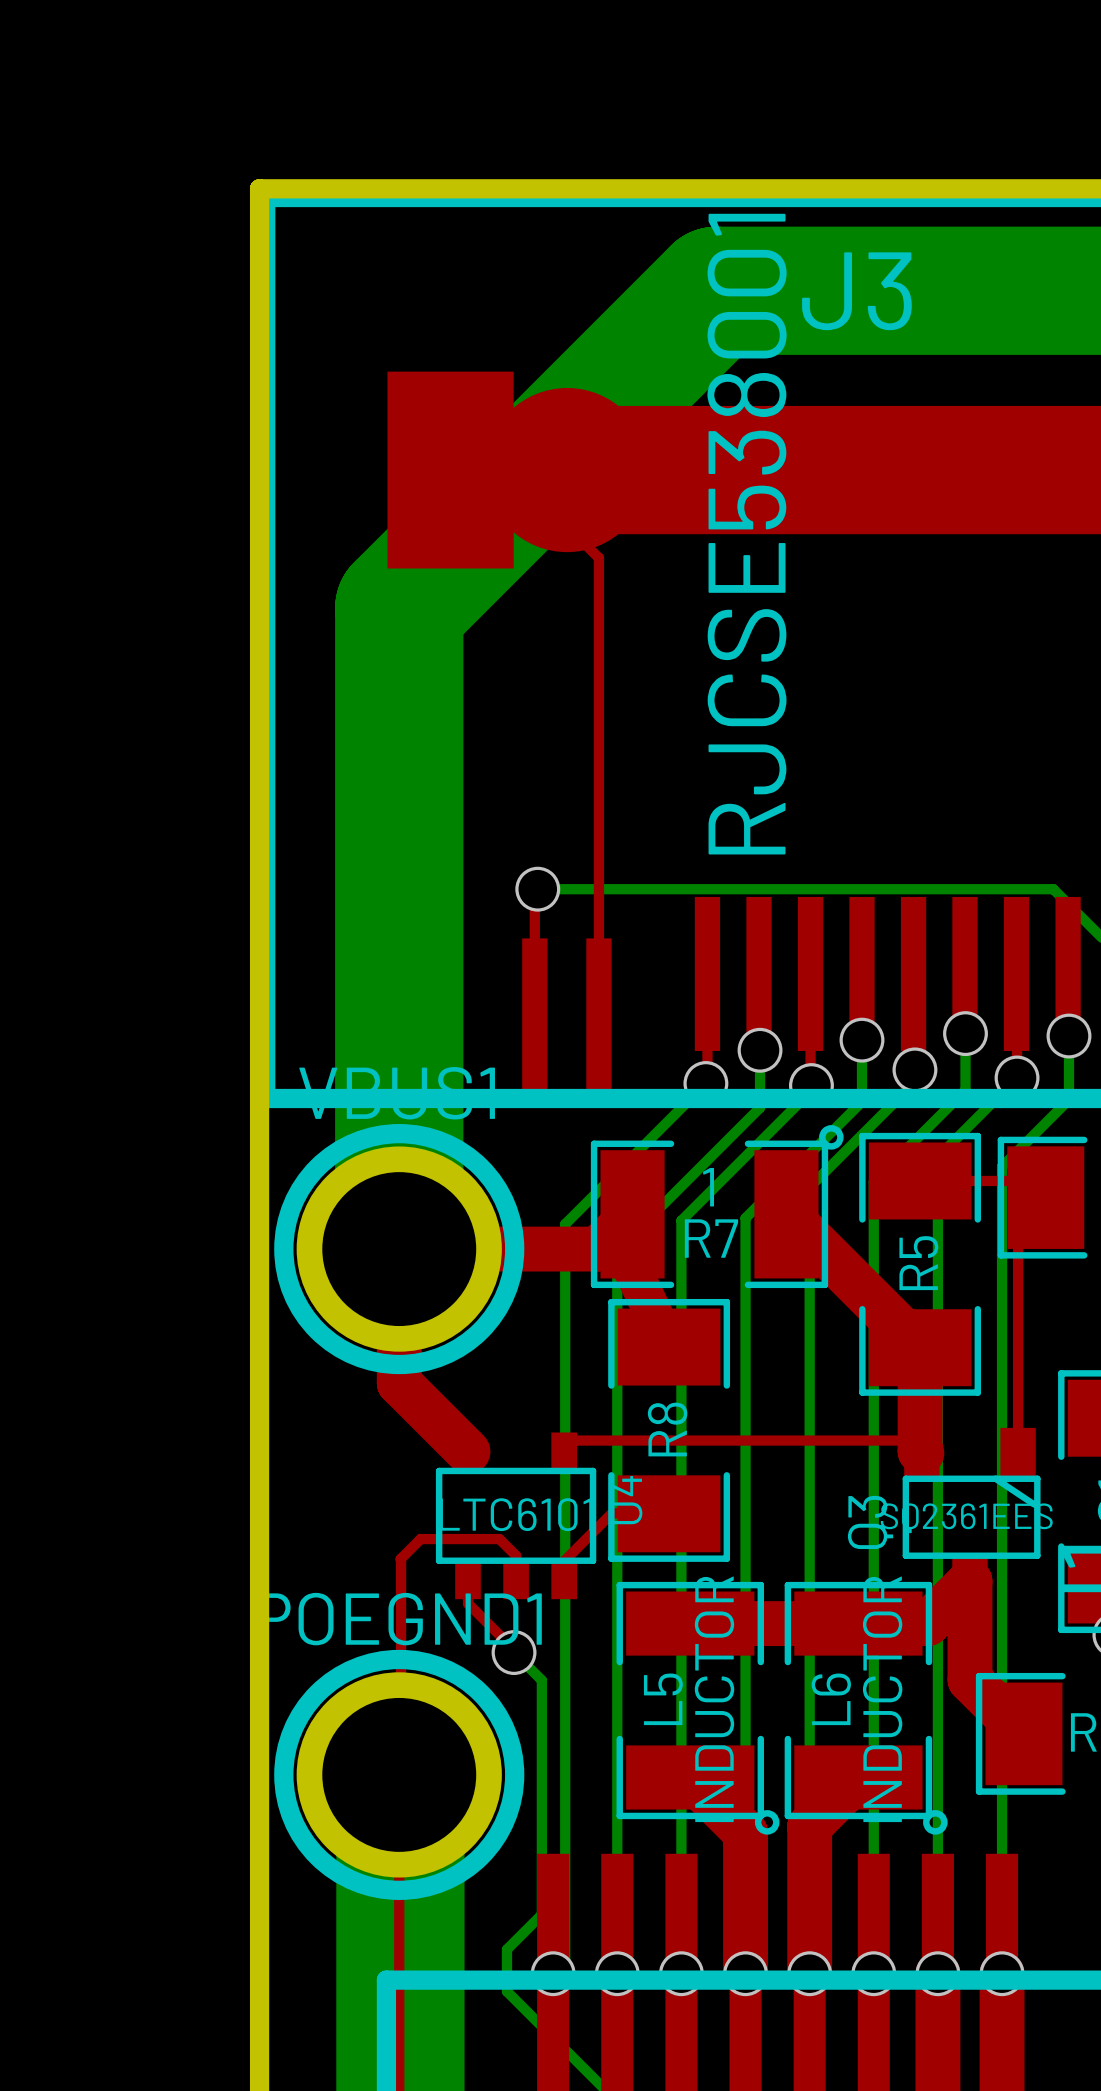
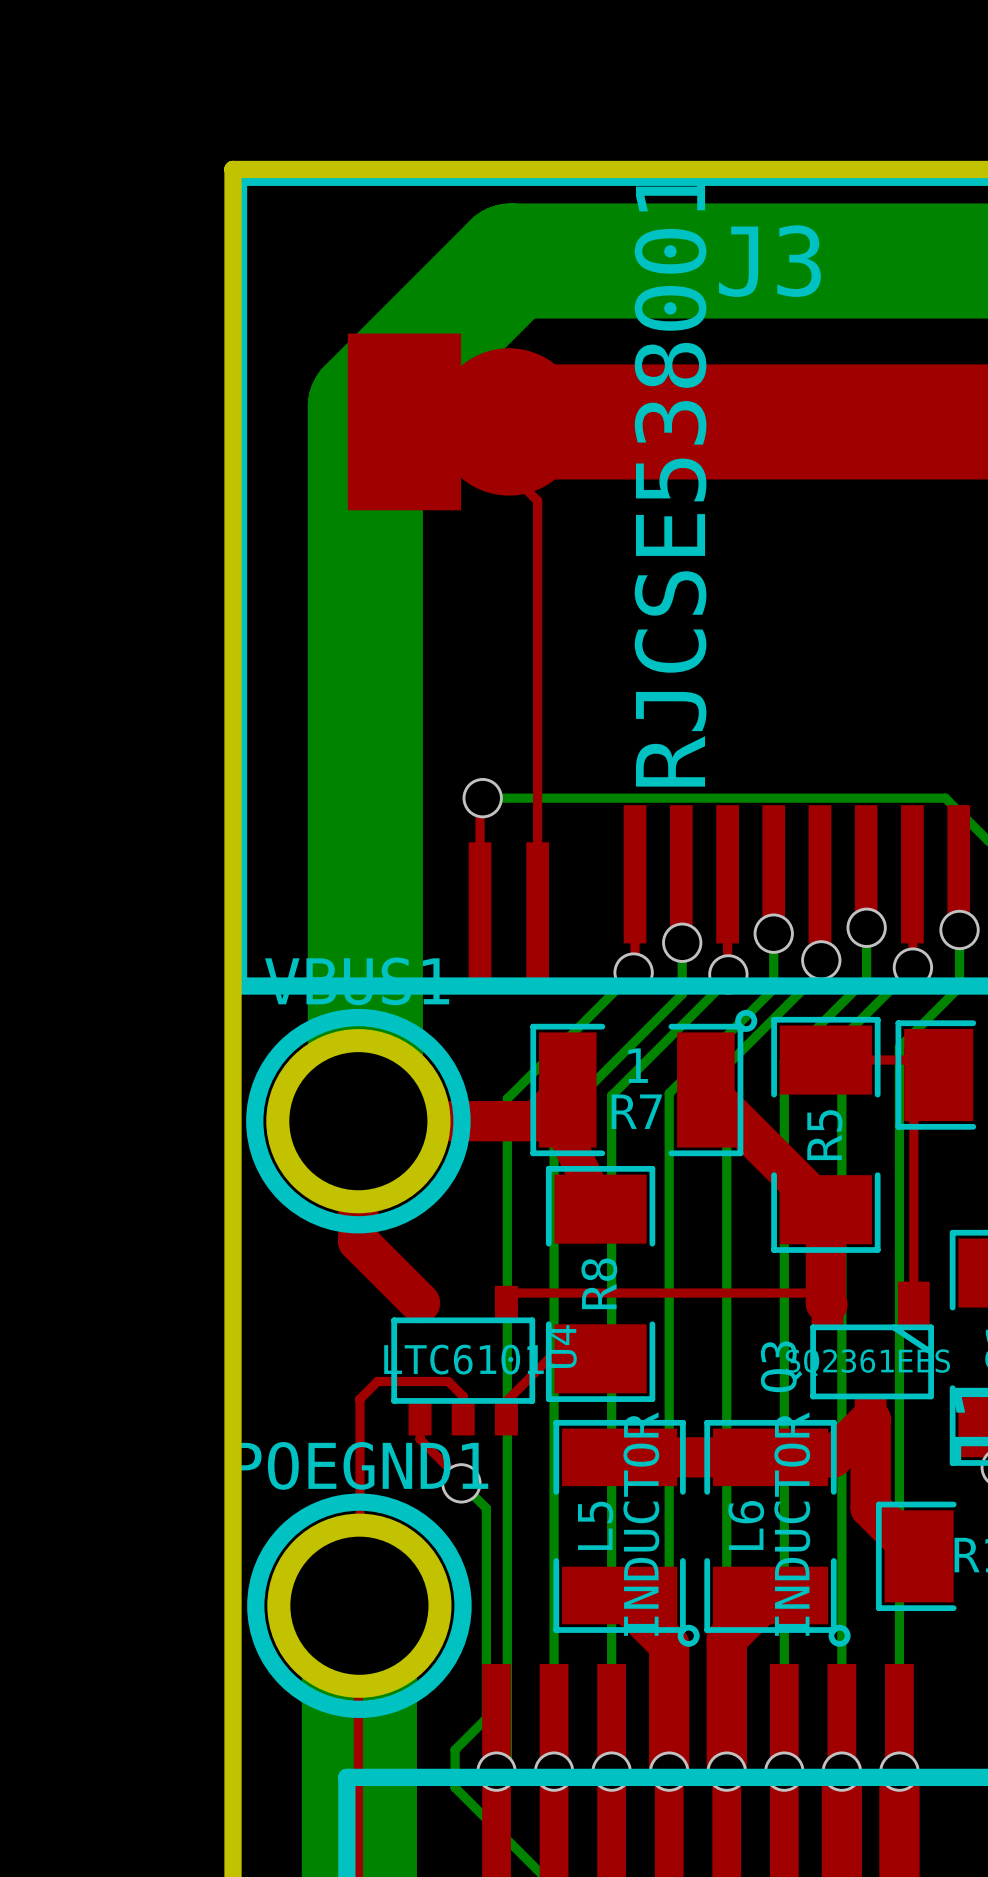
bottom track: (716, 290) (399, 607) (399, 1249) -> (642, 260) (510, 260) (365, 406) (365, 1126)
POEGND1 position: (399, 1774) -> (359, 1605)

